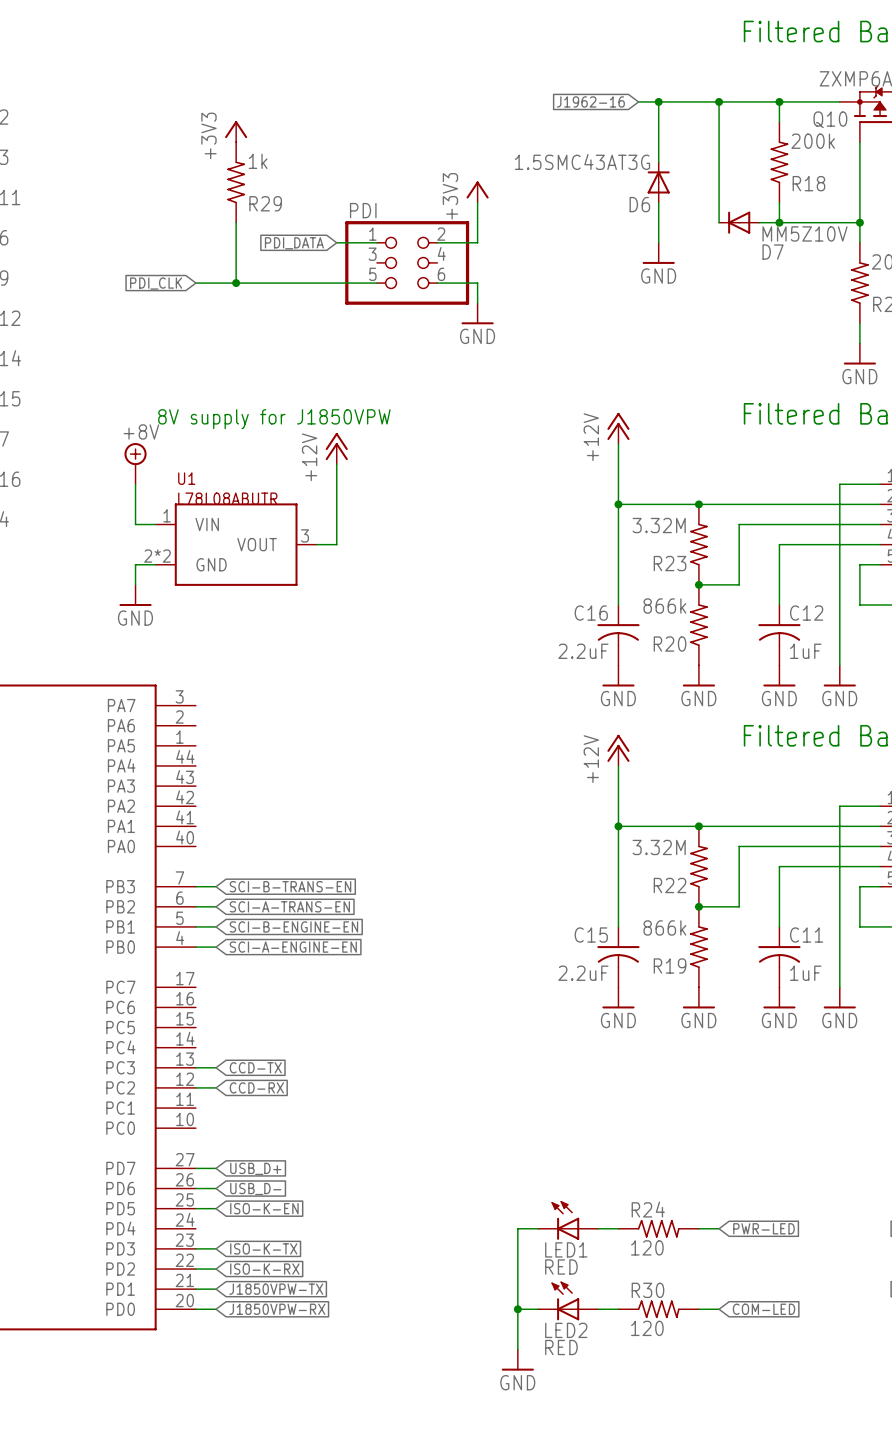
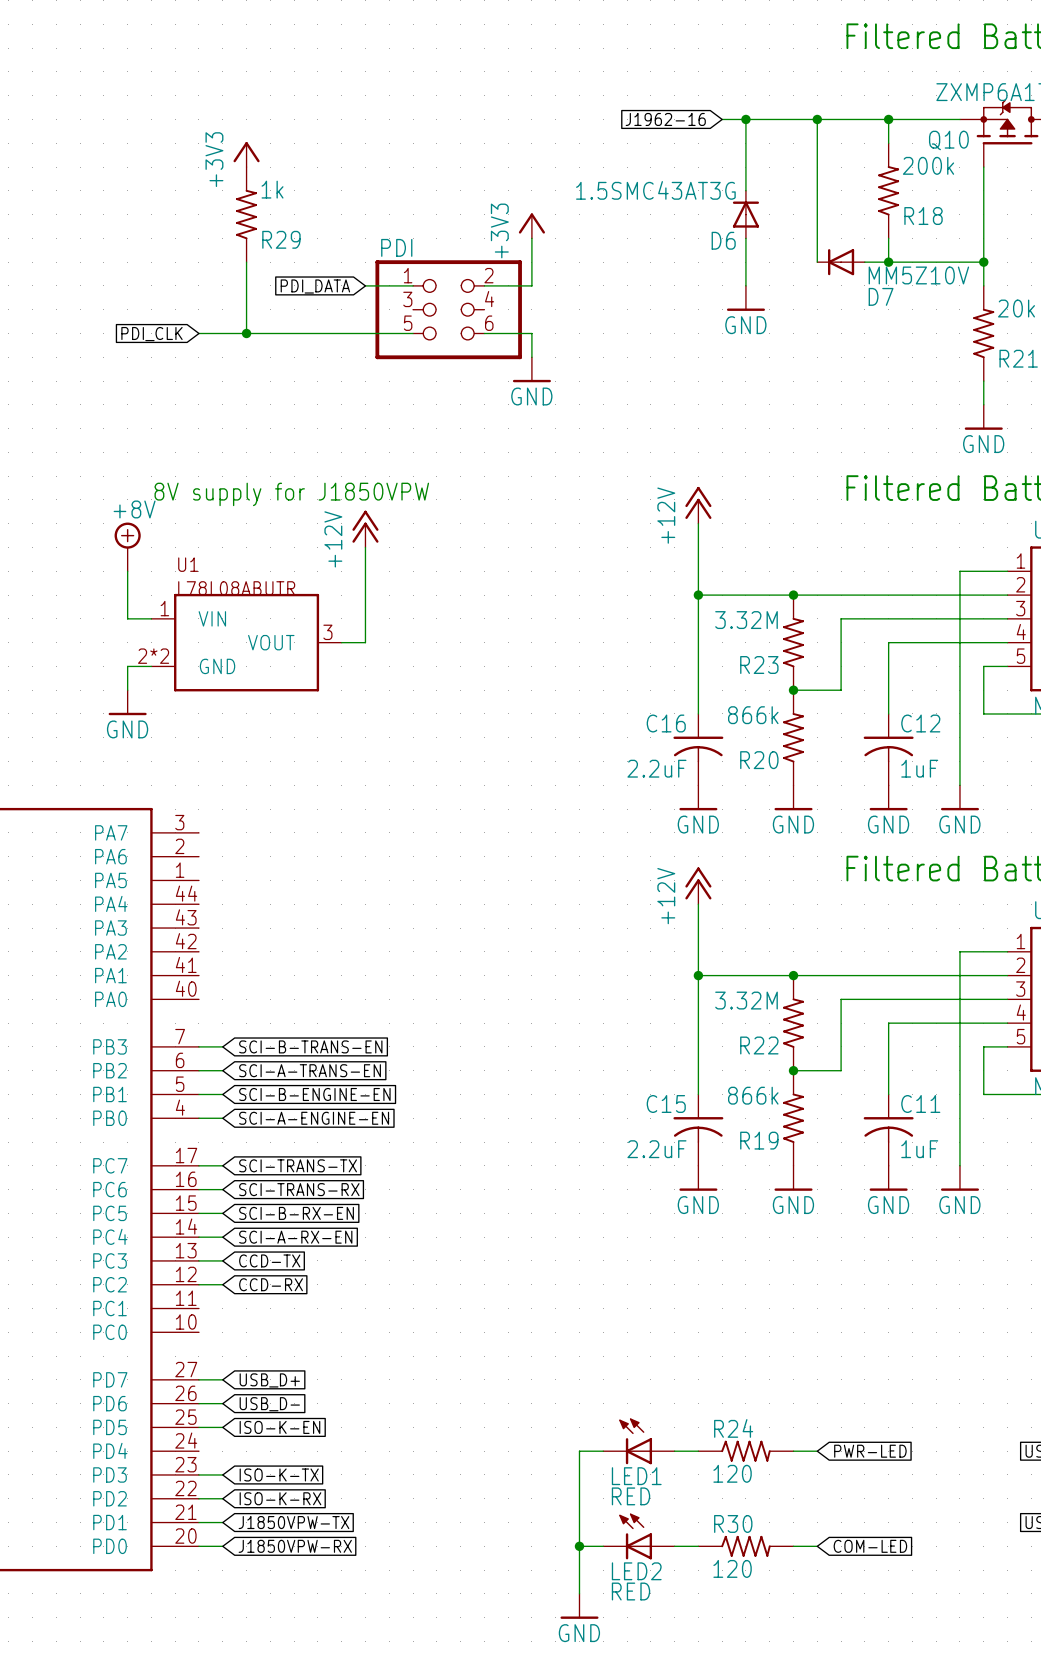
wire: none -> (198, 1165) (222, 1165)
global label: none -> SCI-TRANS-TX (298, 1165)
wire: none -> (198, 1189) (222, 1189)
global label: none -> SCI-TRANS-RX (299, 1189)
wire: none -> (198, 1213) (222, 1213)
global label: none -> SCI-B-RX-EN (296, 1213)
wire: none -> (198, 1237) (222, 1237)
global label: none -> SCI-A-RX-EN (295, 1237)

